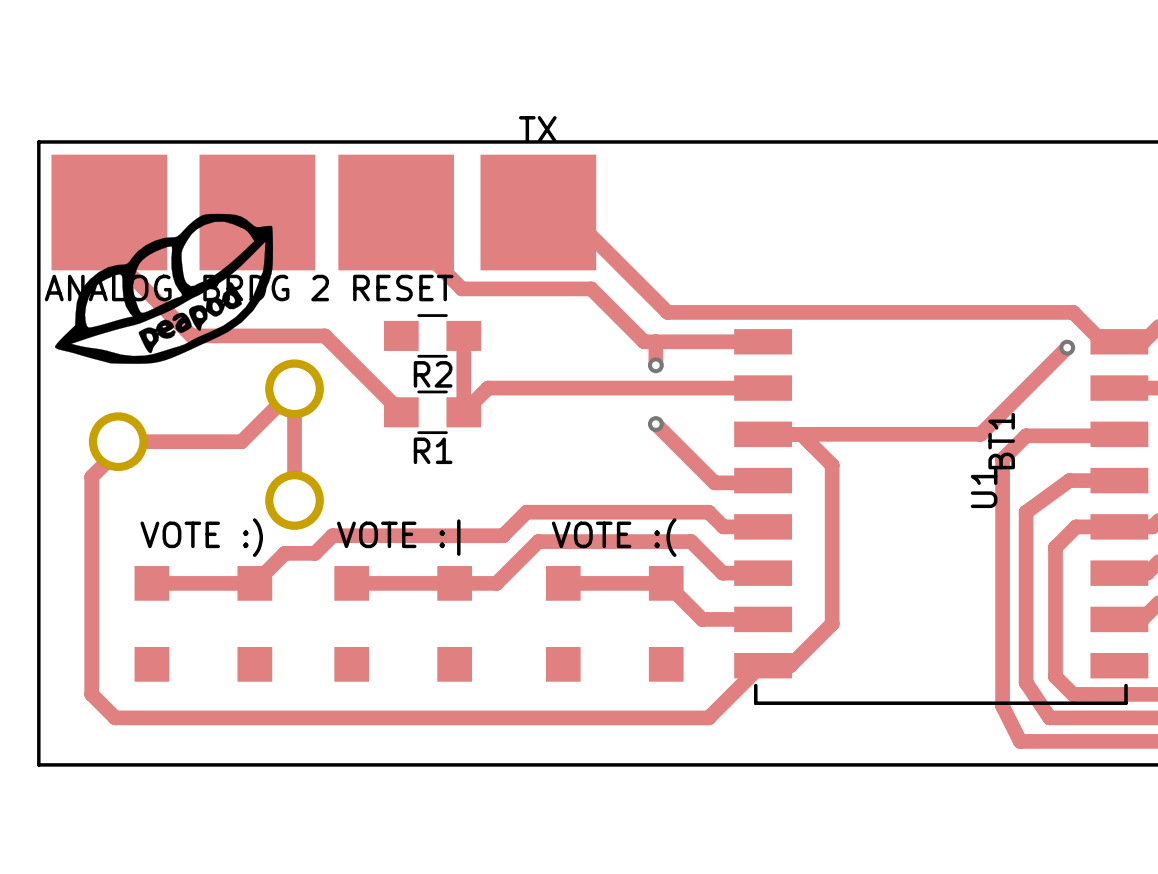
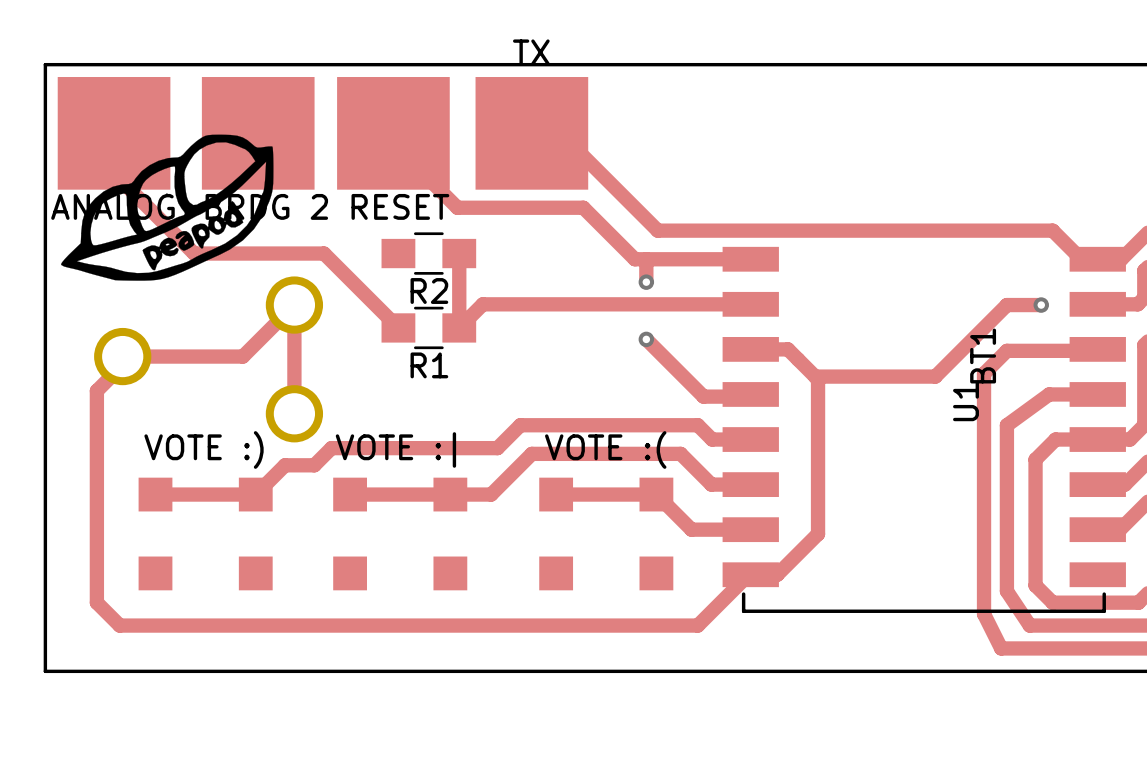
track: (1067, 347) (1026, 388) -> (1041, 305) (1006, 305)
via position: (1067, 347) -> (1041, 305)
track: (801, 434) (980, 434) -> (815, 376) (935, 376) (962, 349)

